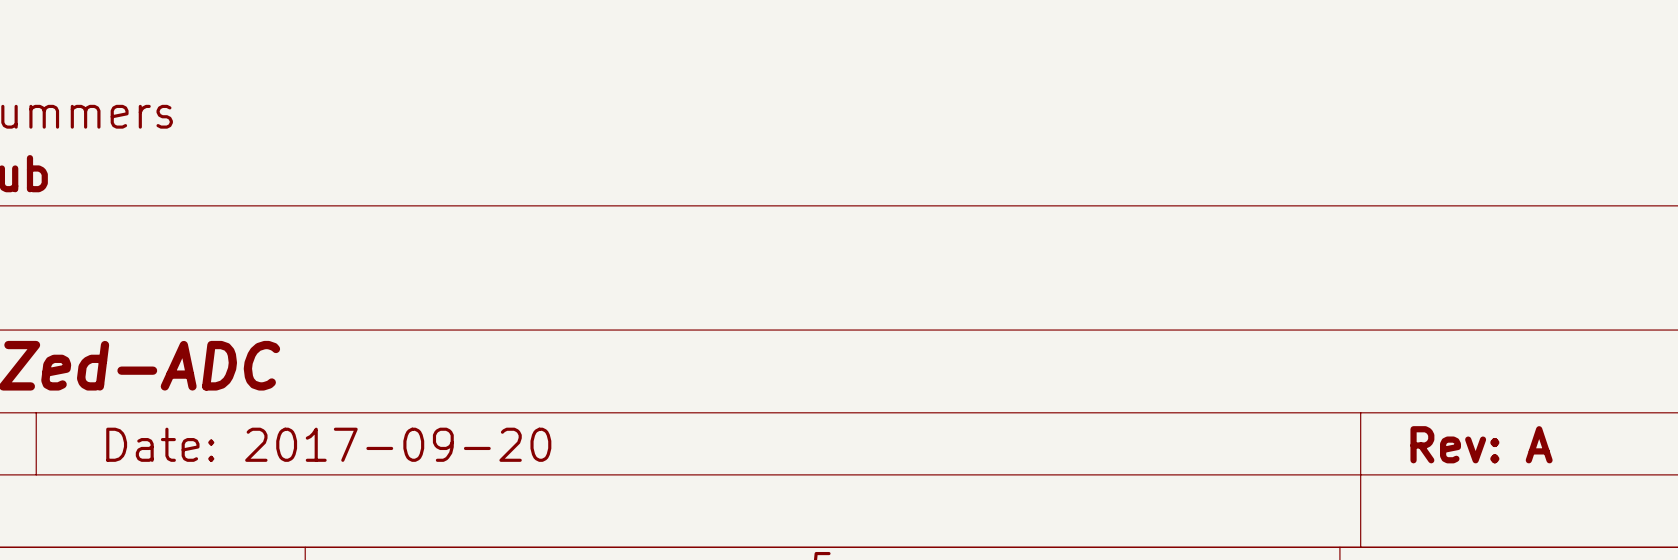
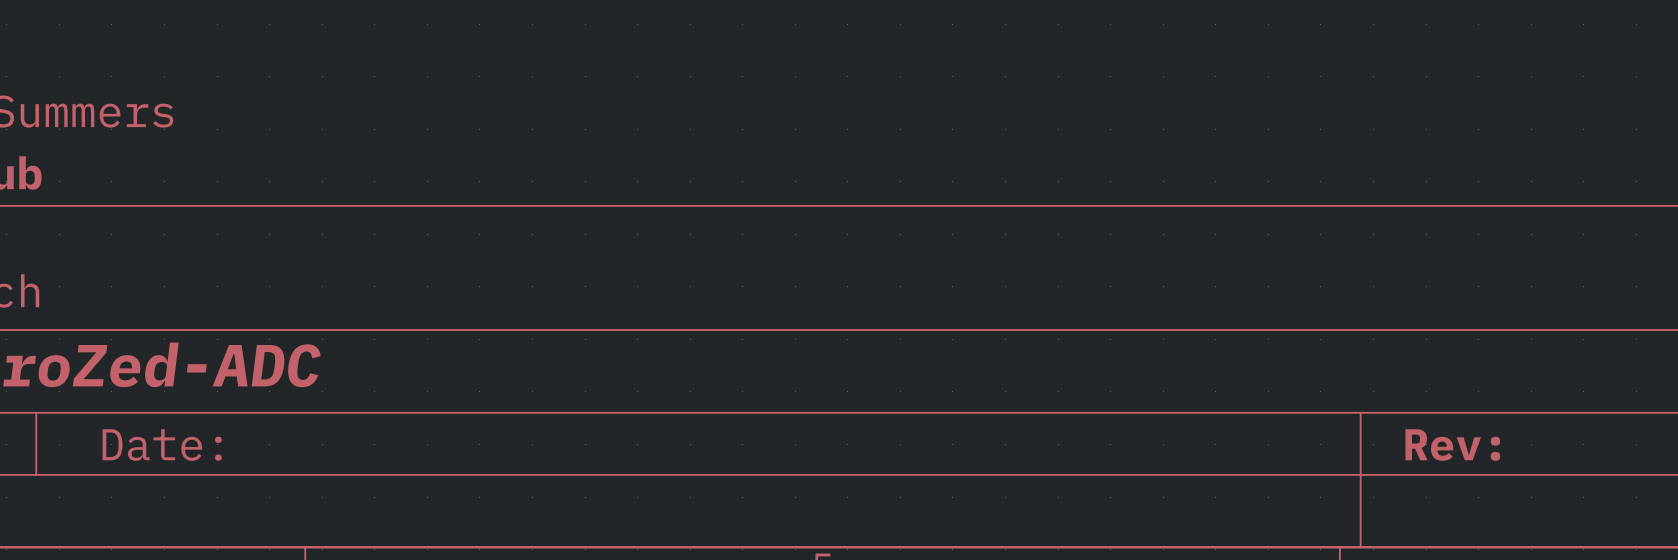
title block: Date: 2017-09-20 (328, 444) -> Date: (162, 445)
title block: Rev: A (1481, 444) -> Rev: (1452, 445)

